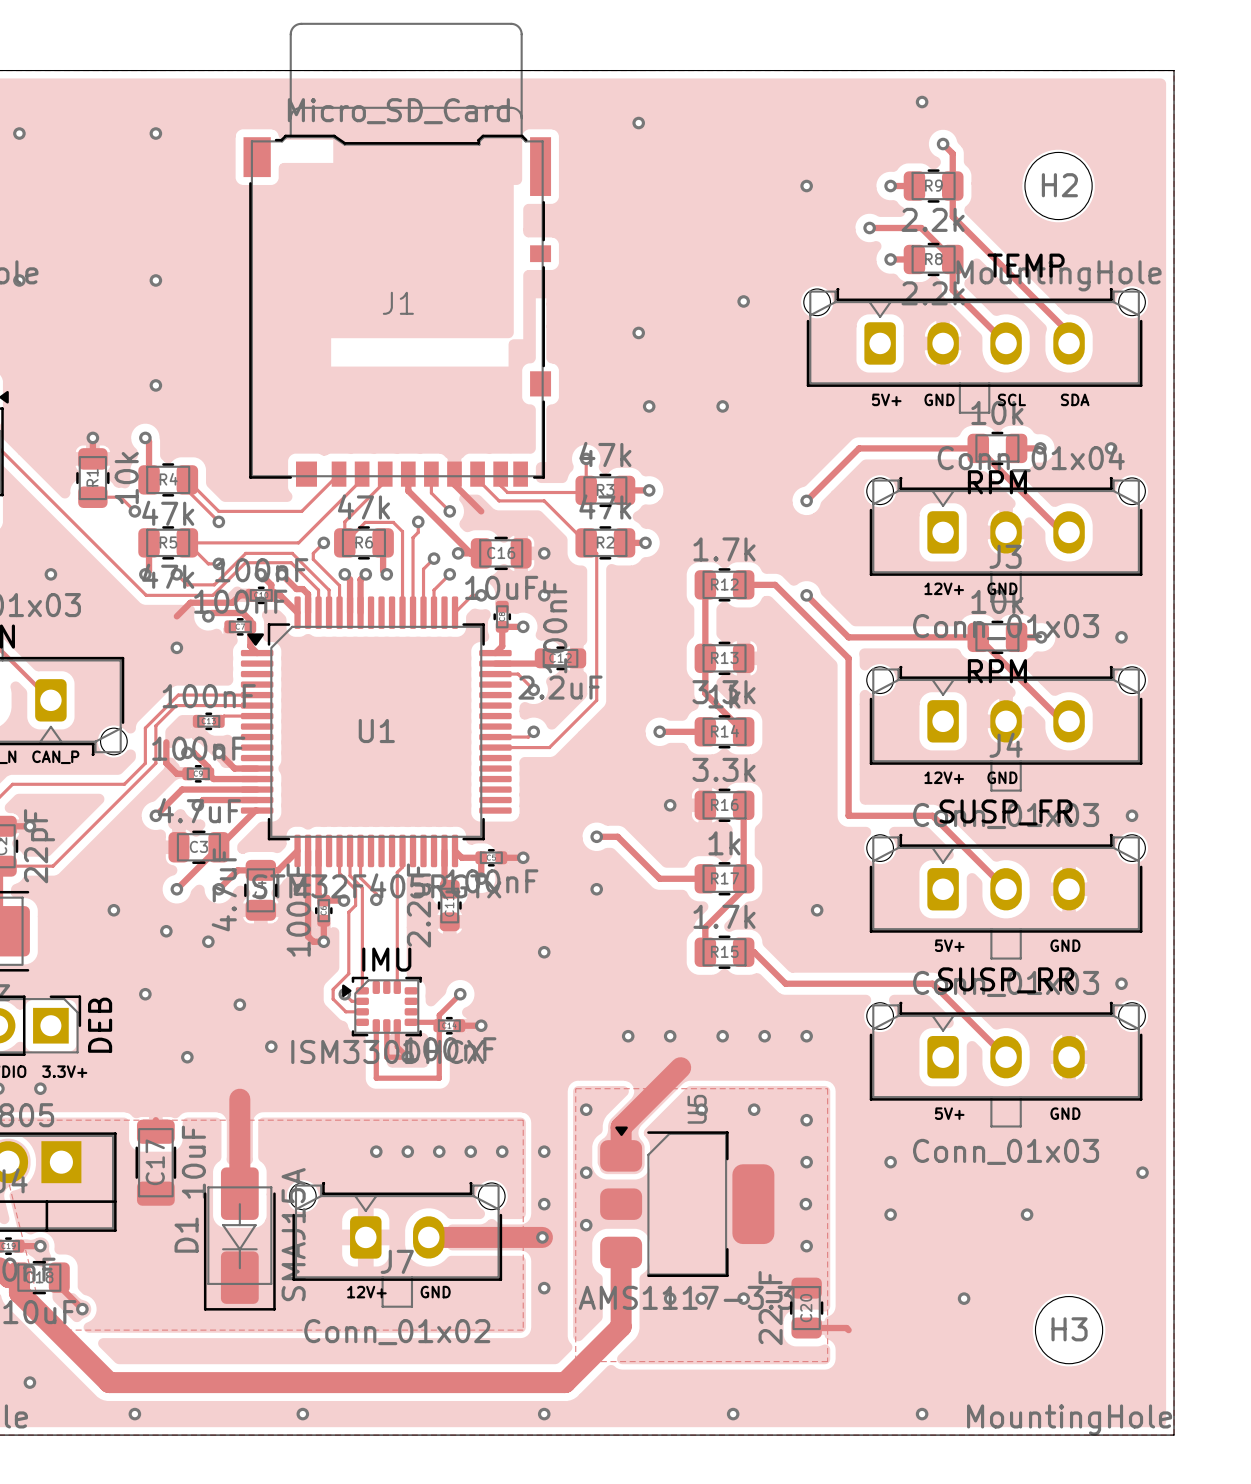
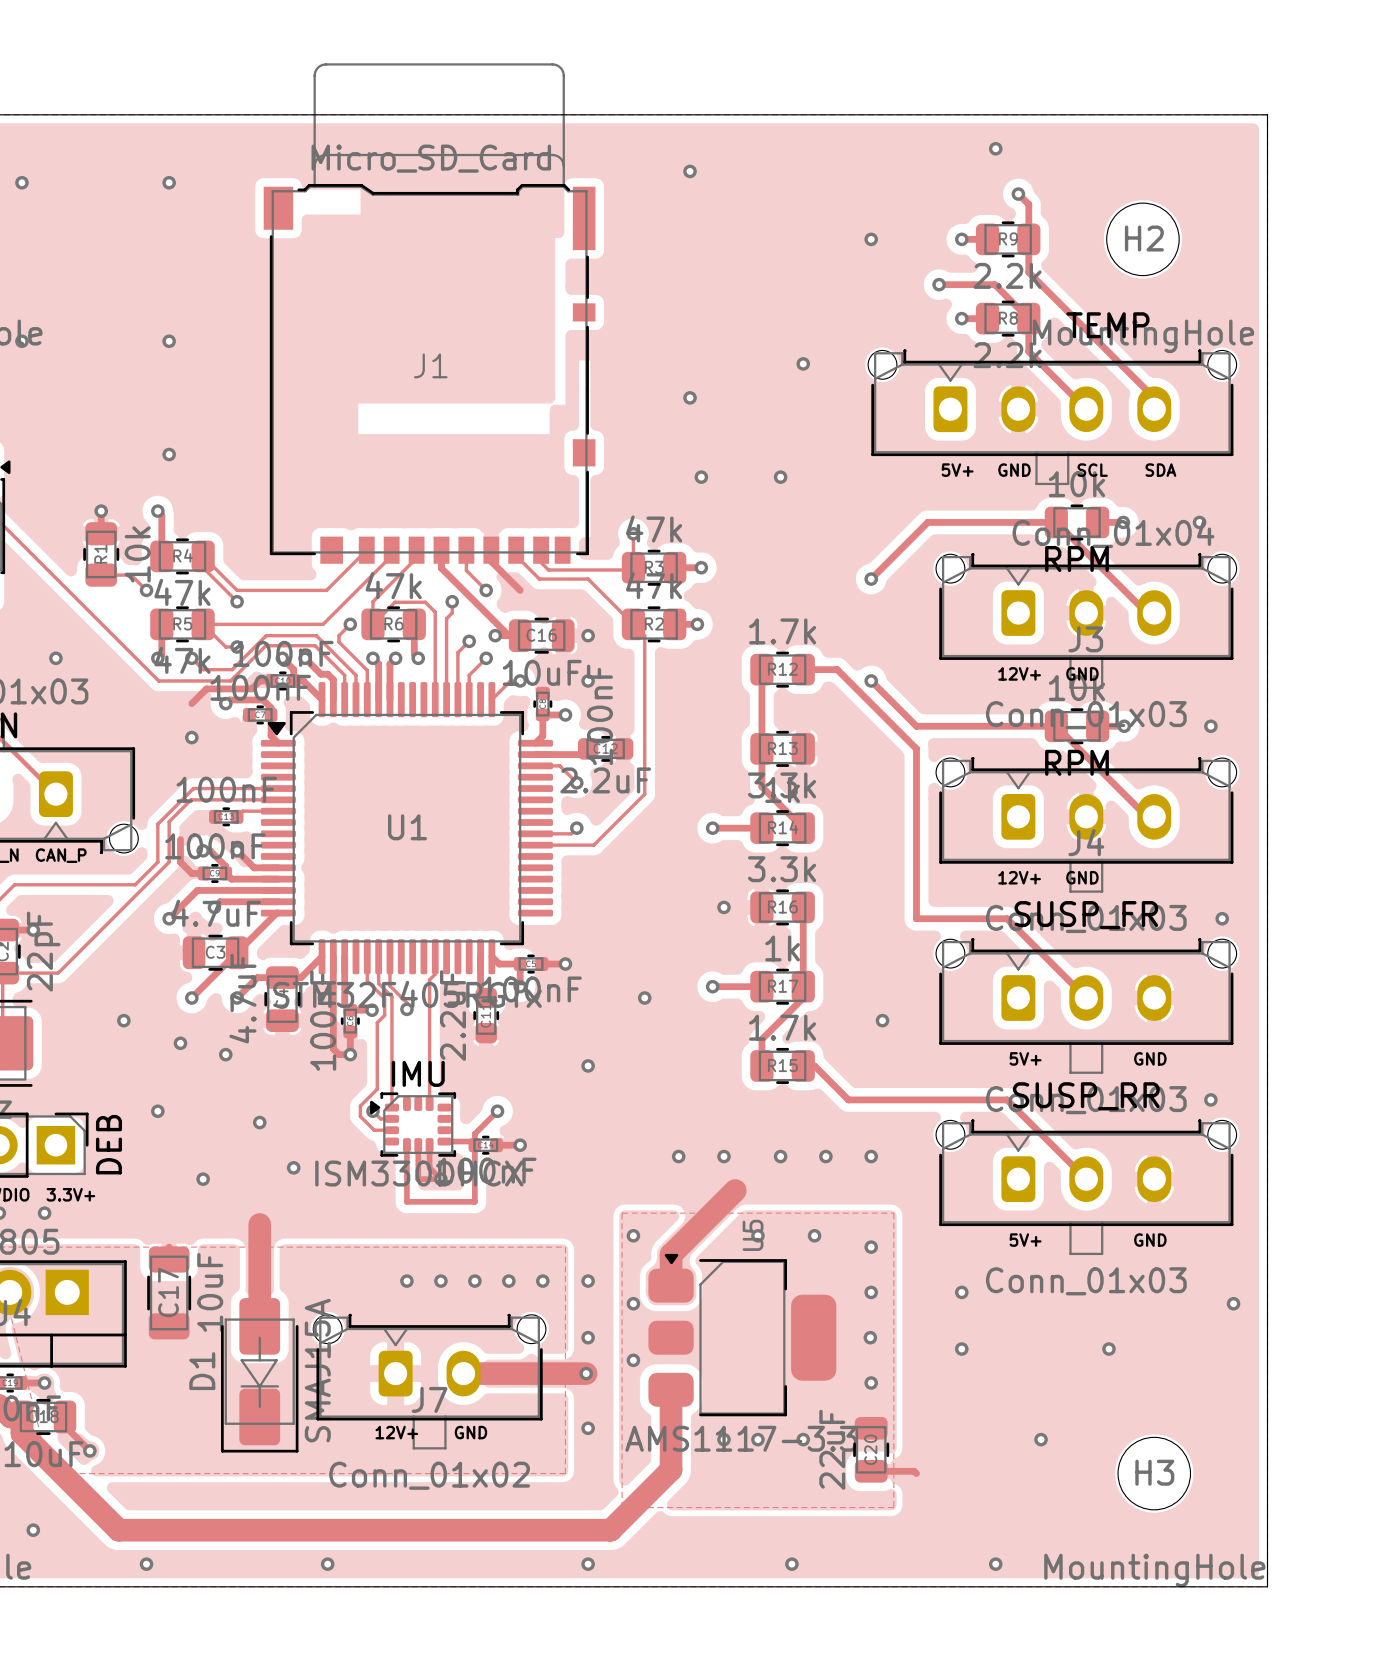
track: (596, 836) (617, 836) (659, 878) -> none
via position: (596, 836) -> (712, 986)

